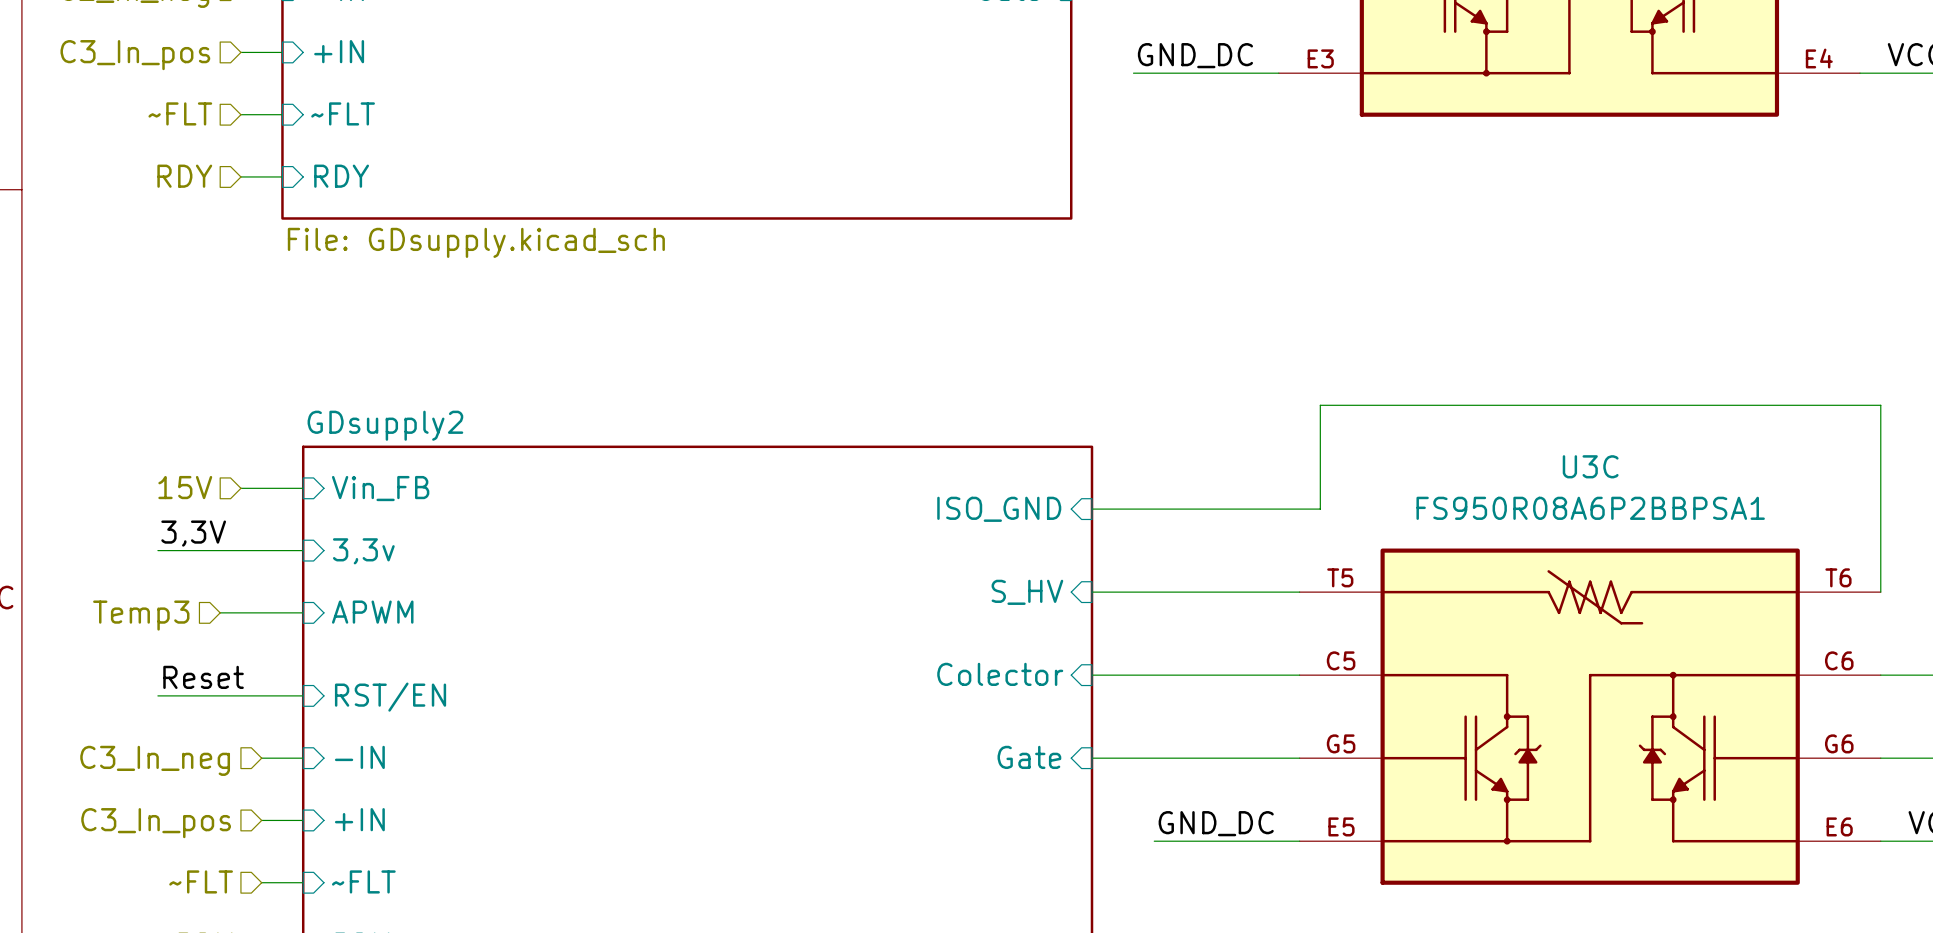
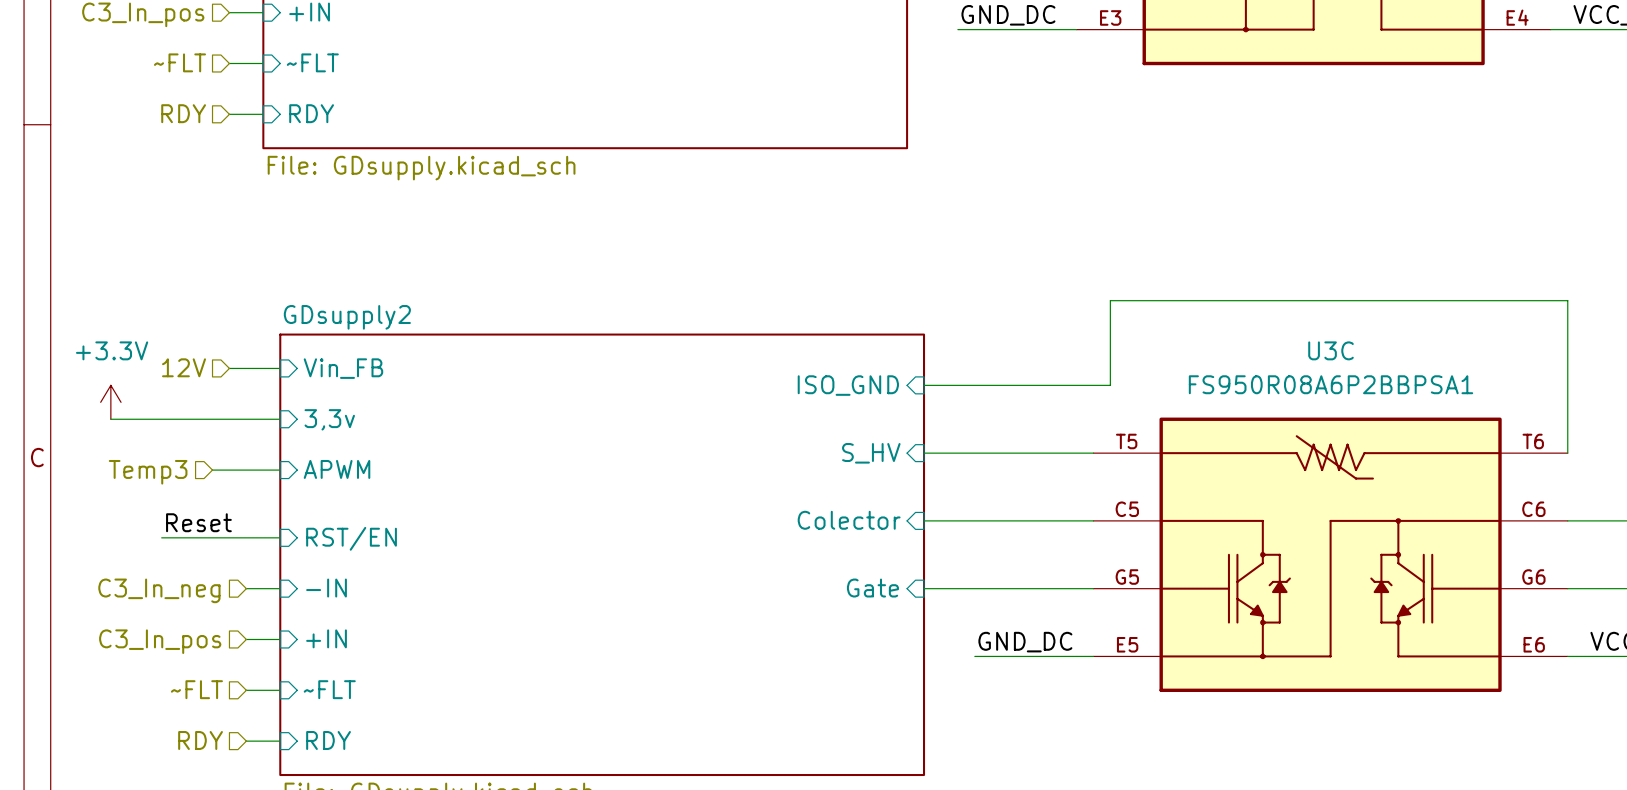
hierarchical label: 15V (185, 487) -> 12V (184, 367)
power symbol: none -> +3.3V (110, 402)
label: 3,3V (193, 533) -> none
wire: none -> (110, 419) (161, 419)

